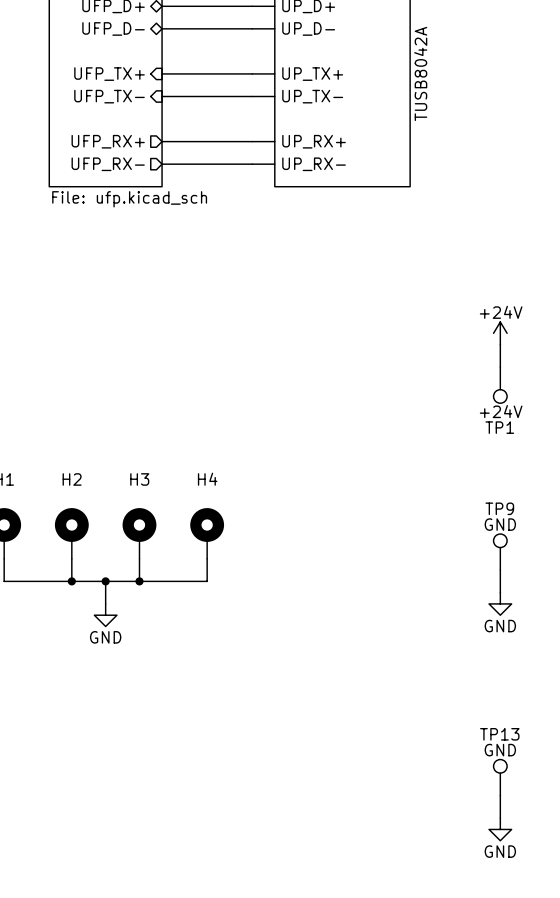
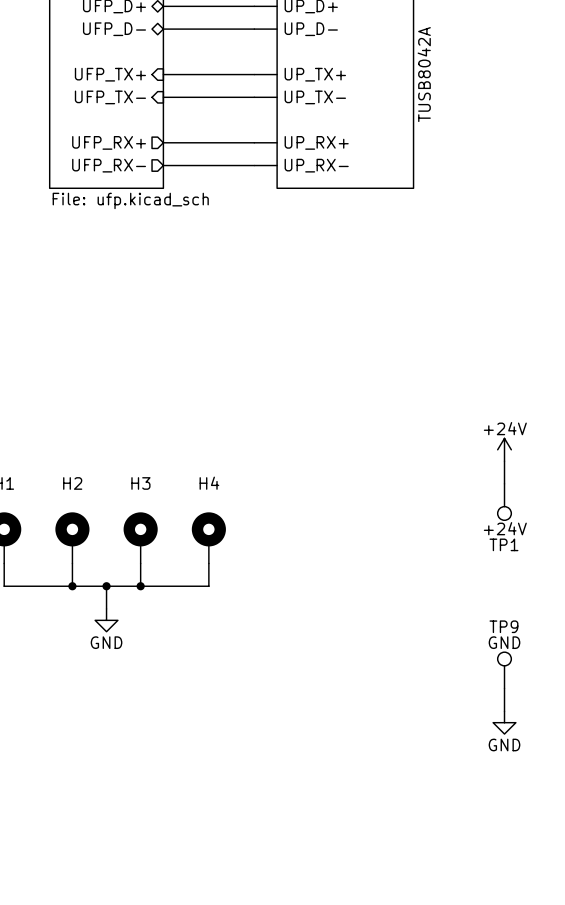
power symbol position: +24V (500, 333) -> +24V (504, 449)
wire: (500, 344) (500, 367) -> (504, 461) (504, 483)
TP1 position: (500, 385) -> (504, 502)
TP9 position: (500, 552) -> (504, 670)
wire: (500, 570) (500, 592) -> none
power symbol: GND (500, 603) -> none
power symbol: none -> GND (504, 722)
TP13: GND (500, 777) -> none
wire: (500, 795) (500, 818) -> (504, 688) (504, 711)
power symbol: GND (500, 829) -> none

